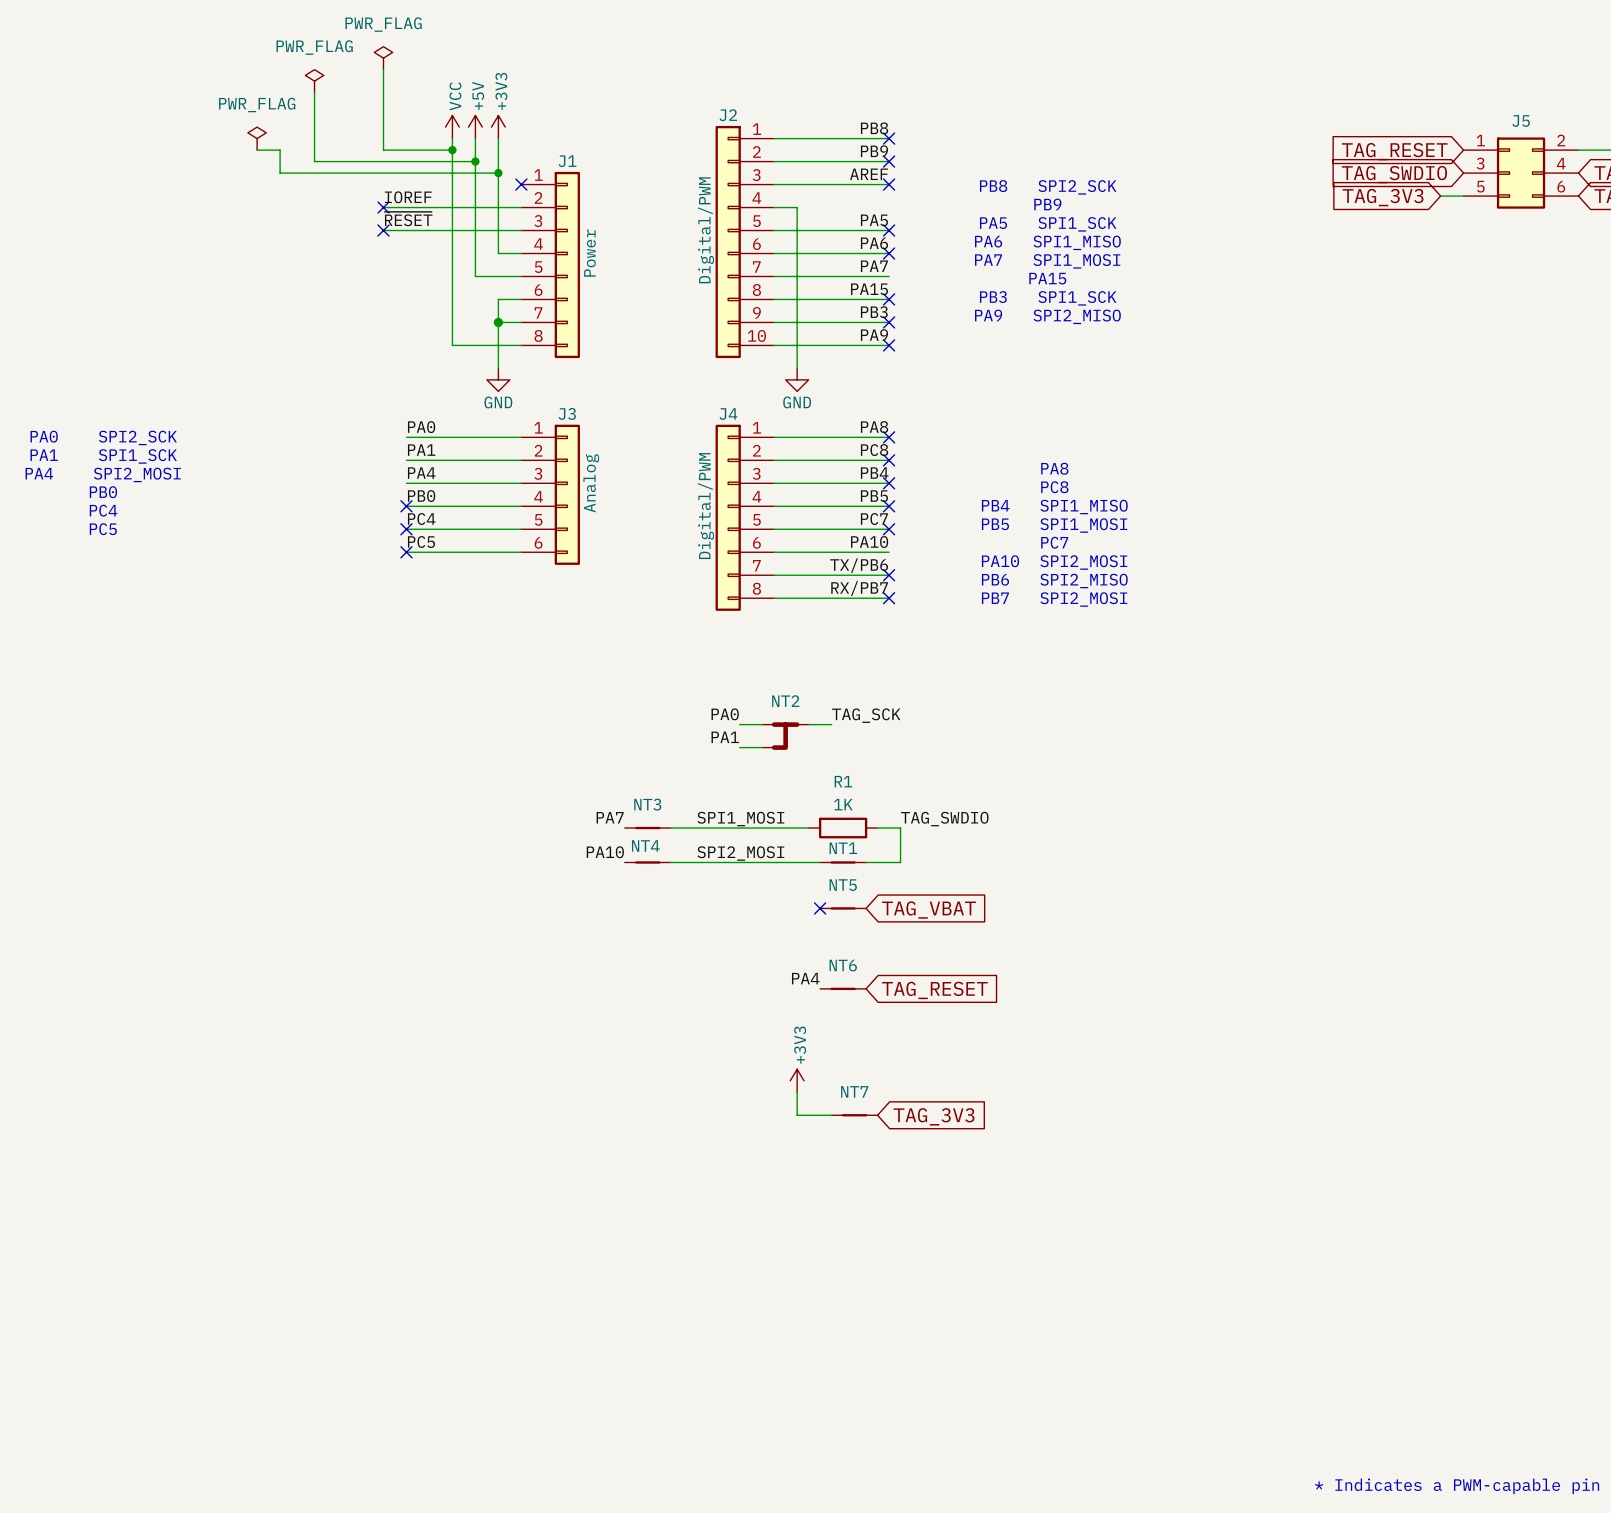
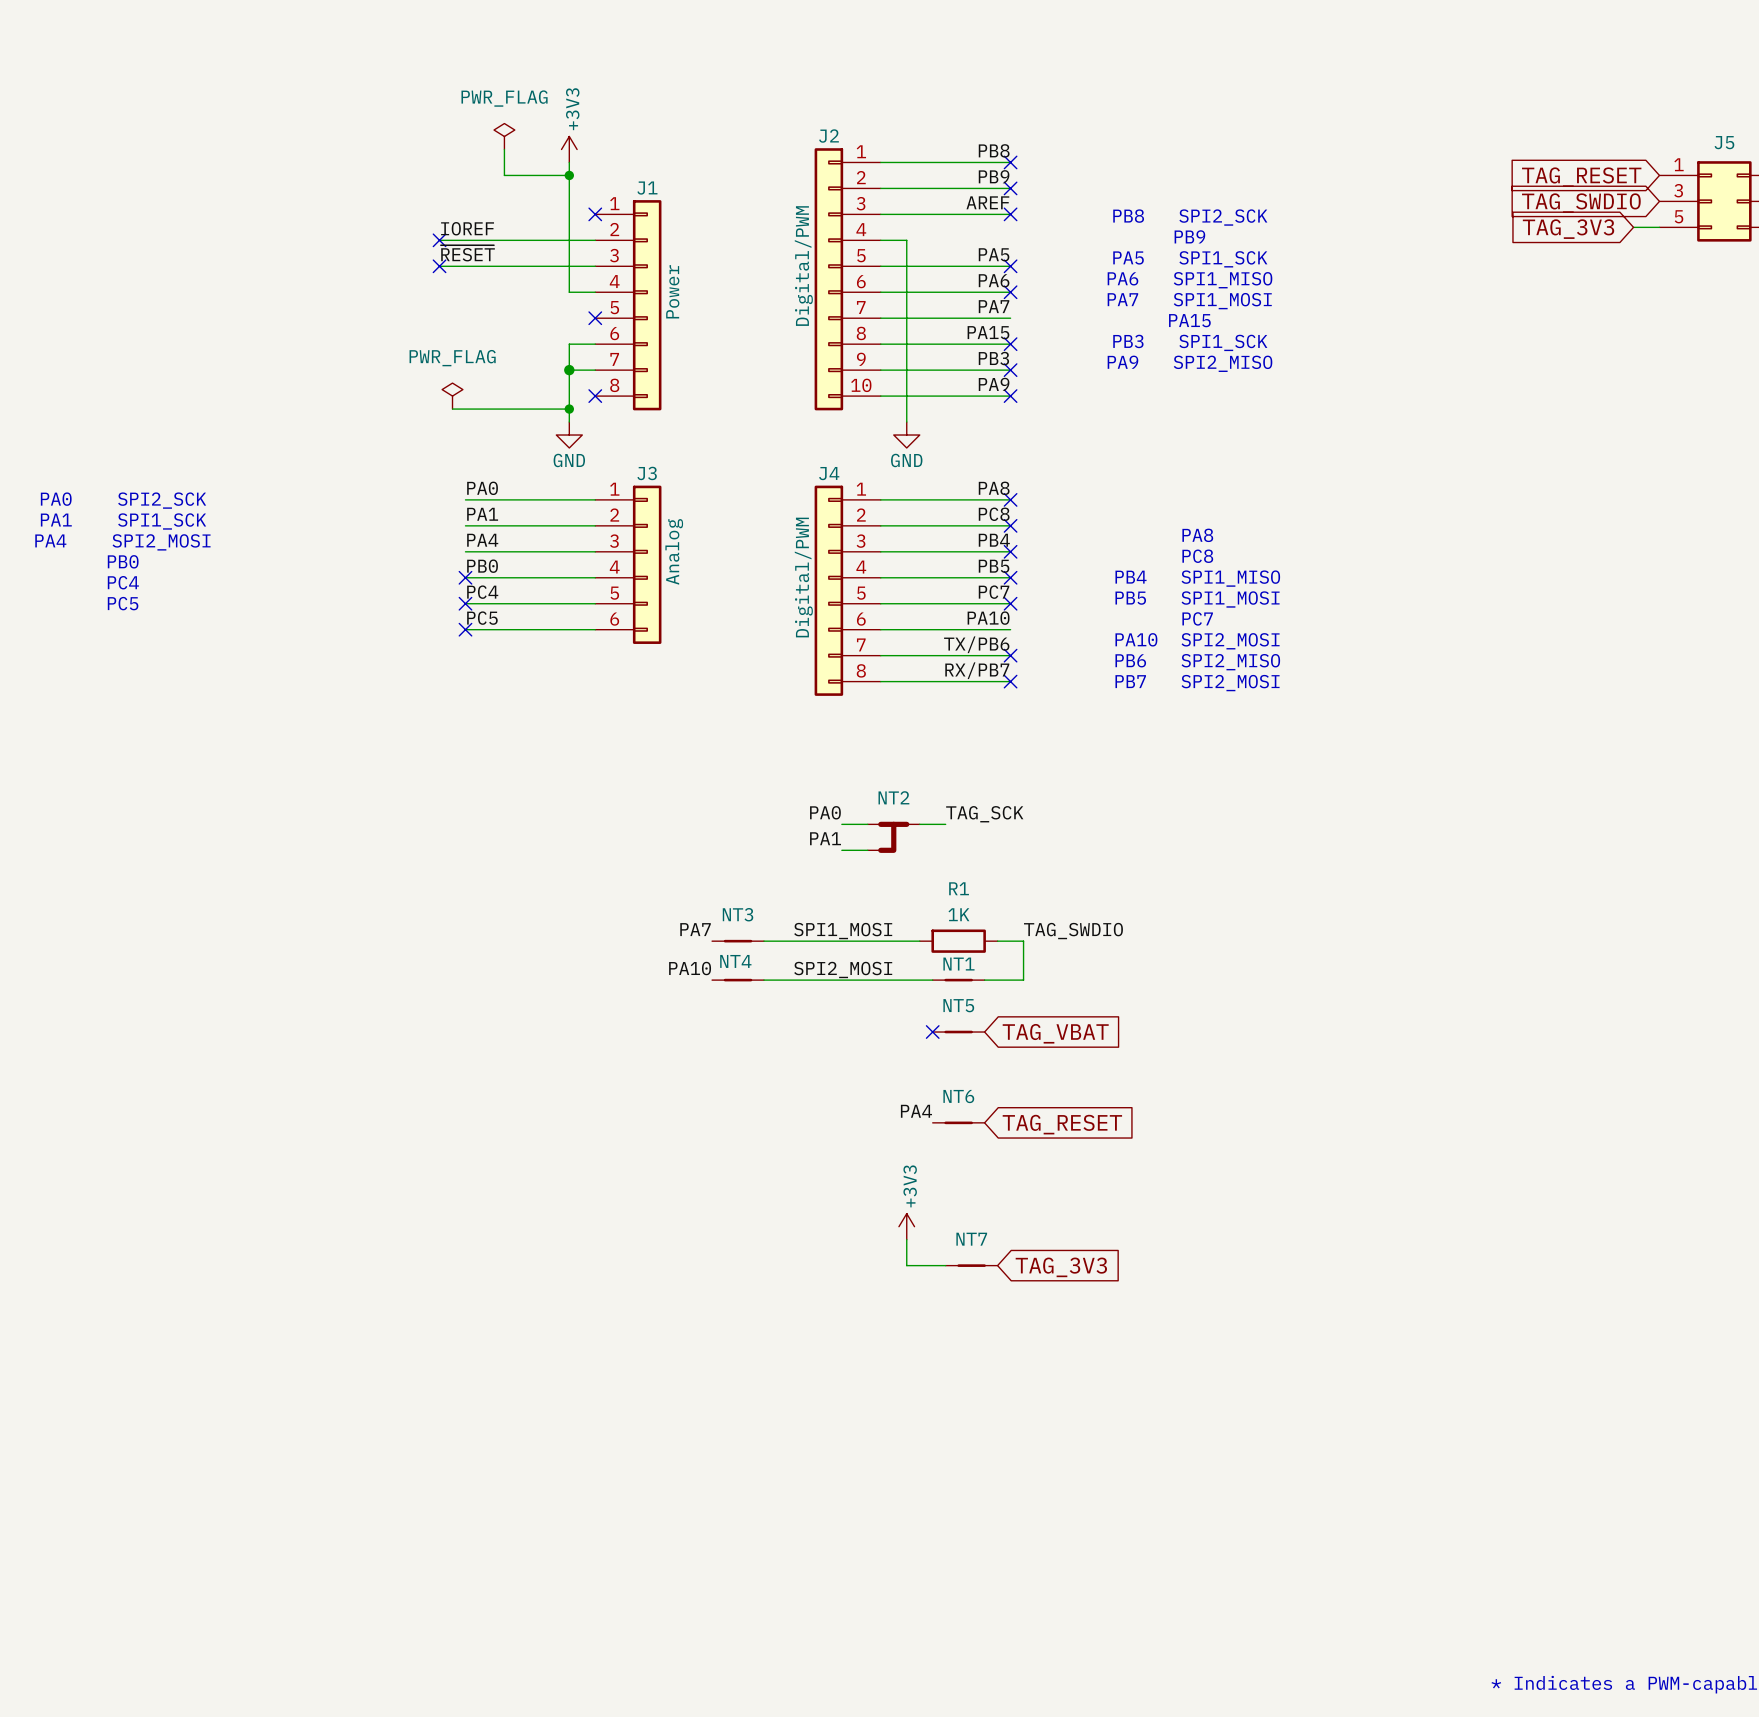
power symbol: PWR_FLAG (383, 58) -> none
wire: (383, 69) (383, 150) (440, 150) -> (504, 149) (504, 175)
power symbol: PWR_FLAG (314, 81) -> none
wire: (314, 92) (314, 161) (475, 161) -> none
power symbol: none -> PWR_FLAG (504, 136)
power symbol: VCC (452, 127) -> none
power symbol: +5V (475, 127) -> none
power symbol: PWR_FLAG (257, 138) -> none
wire: (452, 138) (452, 345) (521, 345) -> none
wire: (475, 138) (475, 276) (521, 276) -> none
wire: (257, 150) (280, 150) (280, 173) (498, 173) -> none
wire: none -> (517, 175) (569, 175)
junction: (452, 150) -> none
junction: none -> (569, 175)
junction: (475, 161) -> none
junction: (498, 173) -> none
no-connect mark: none -> (595, 318)
power symbol: none -> PWR_FLAG (452, 396)
no-connect mark: none -> (595, 396)
wire: none -> (452, 409) (569, 409)
junction: none -> (569, 409)

